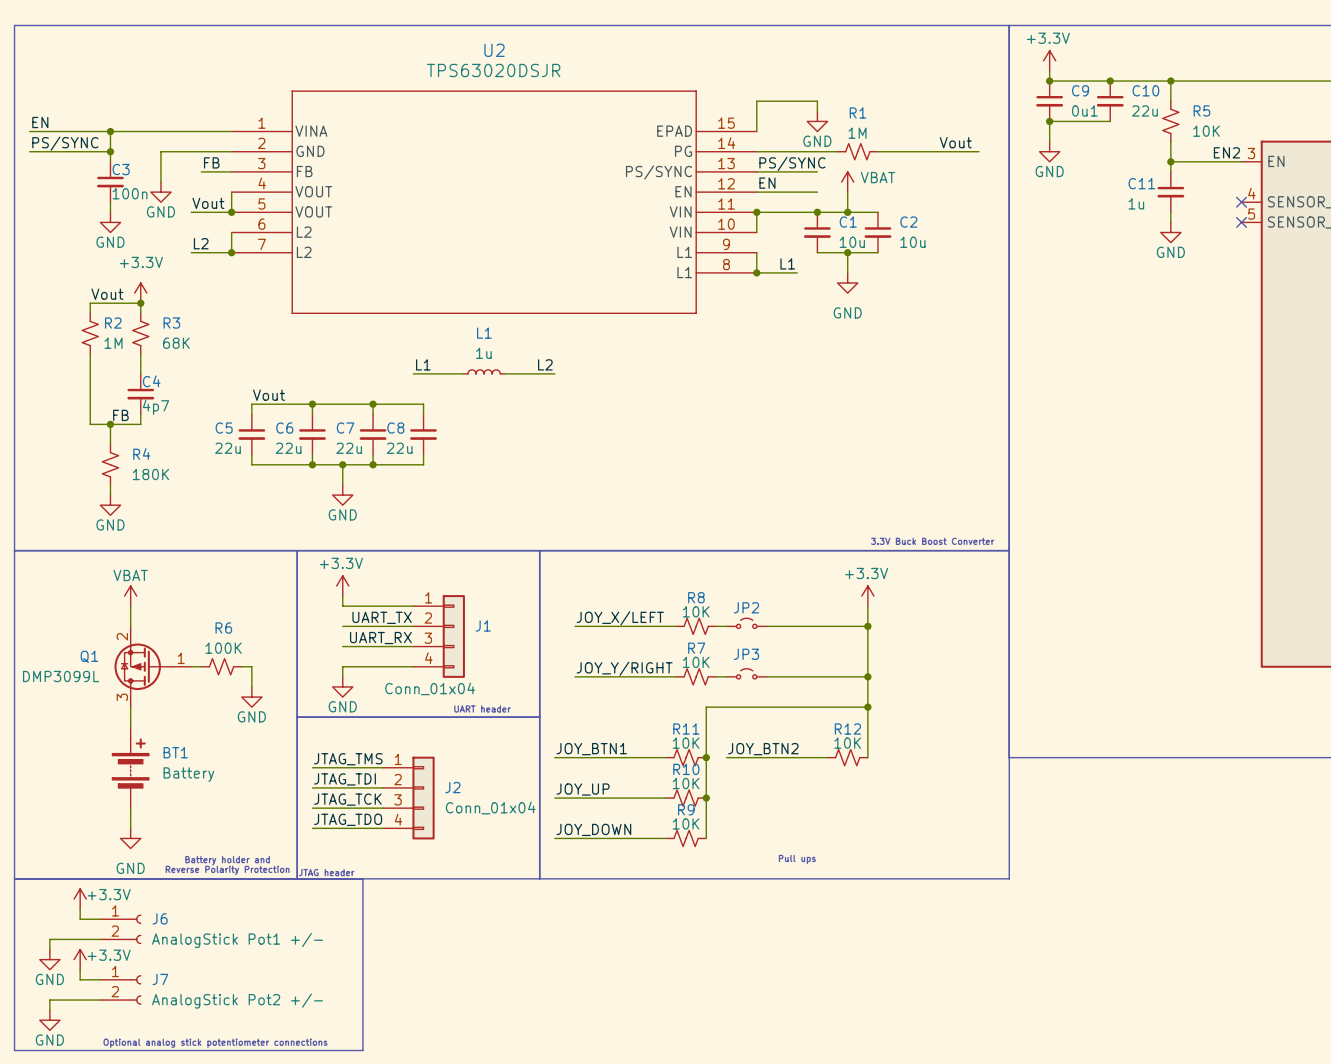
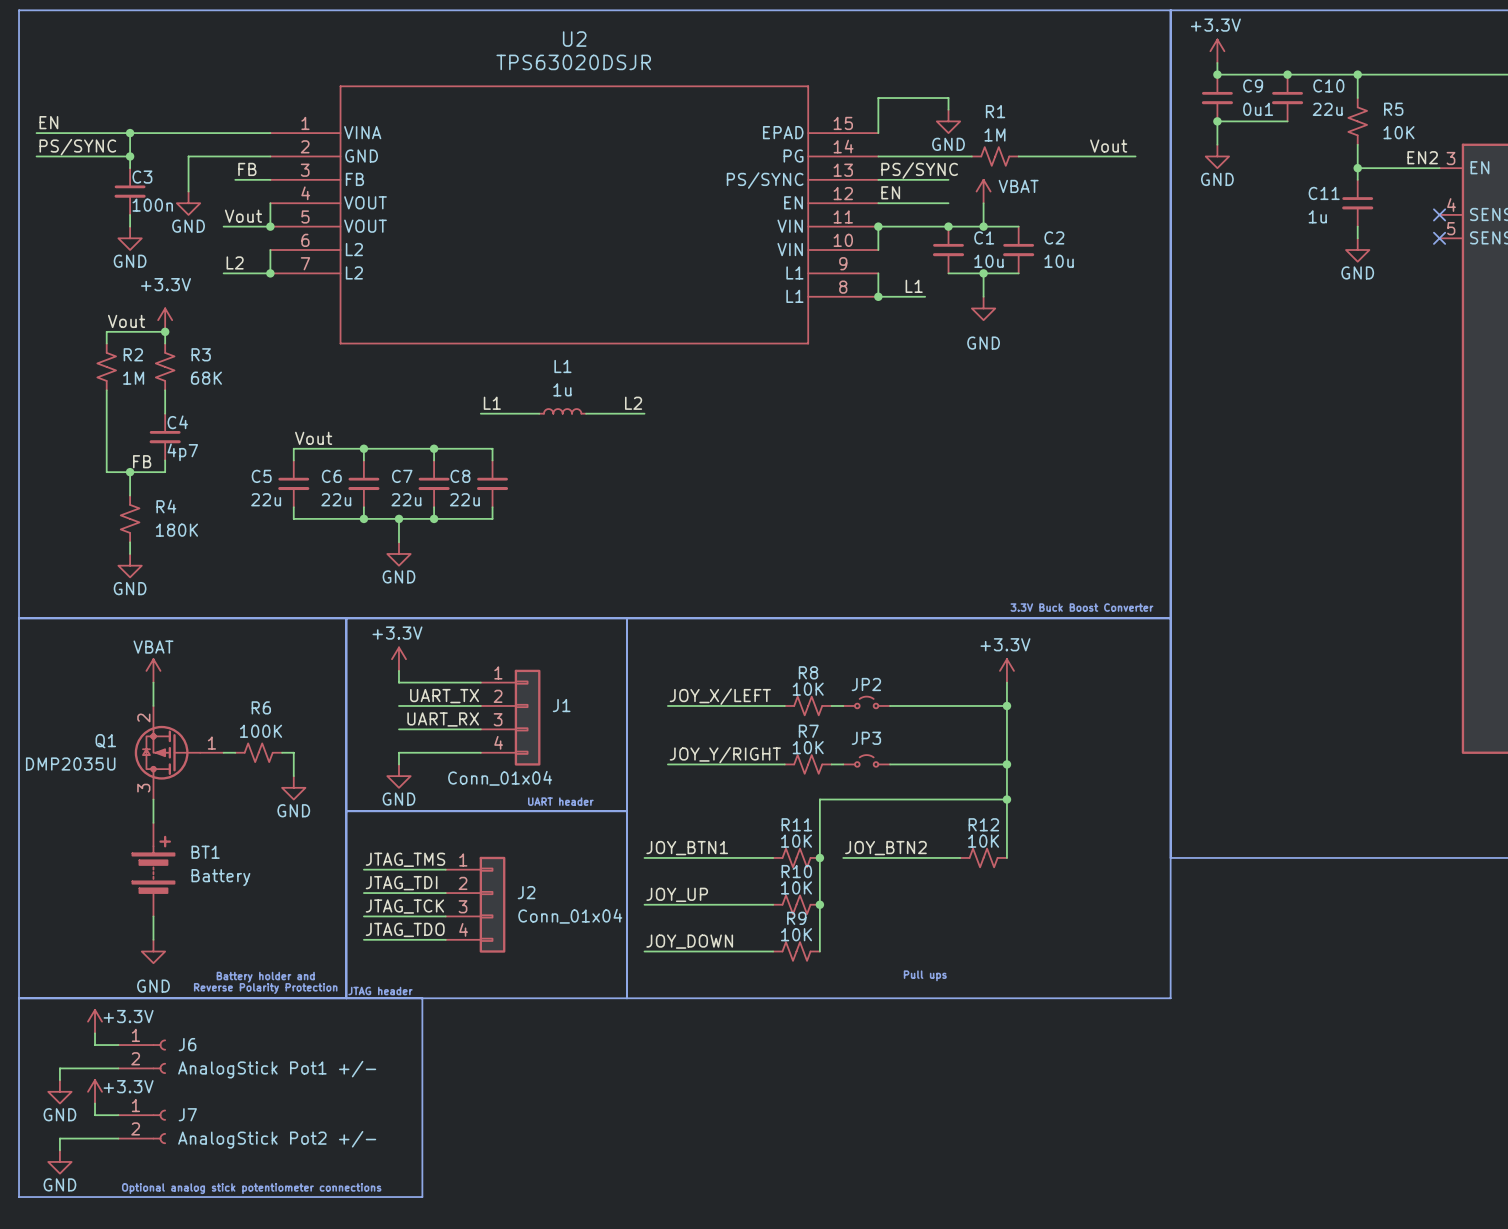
Q1 value: DMP3099L (61, 676) -> DMP2035U (70, 764)

